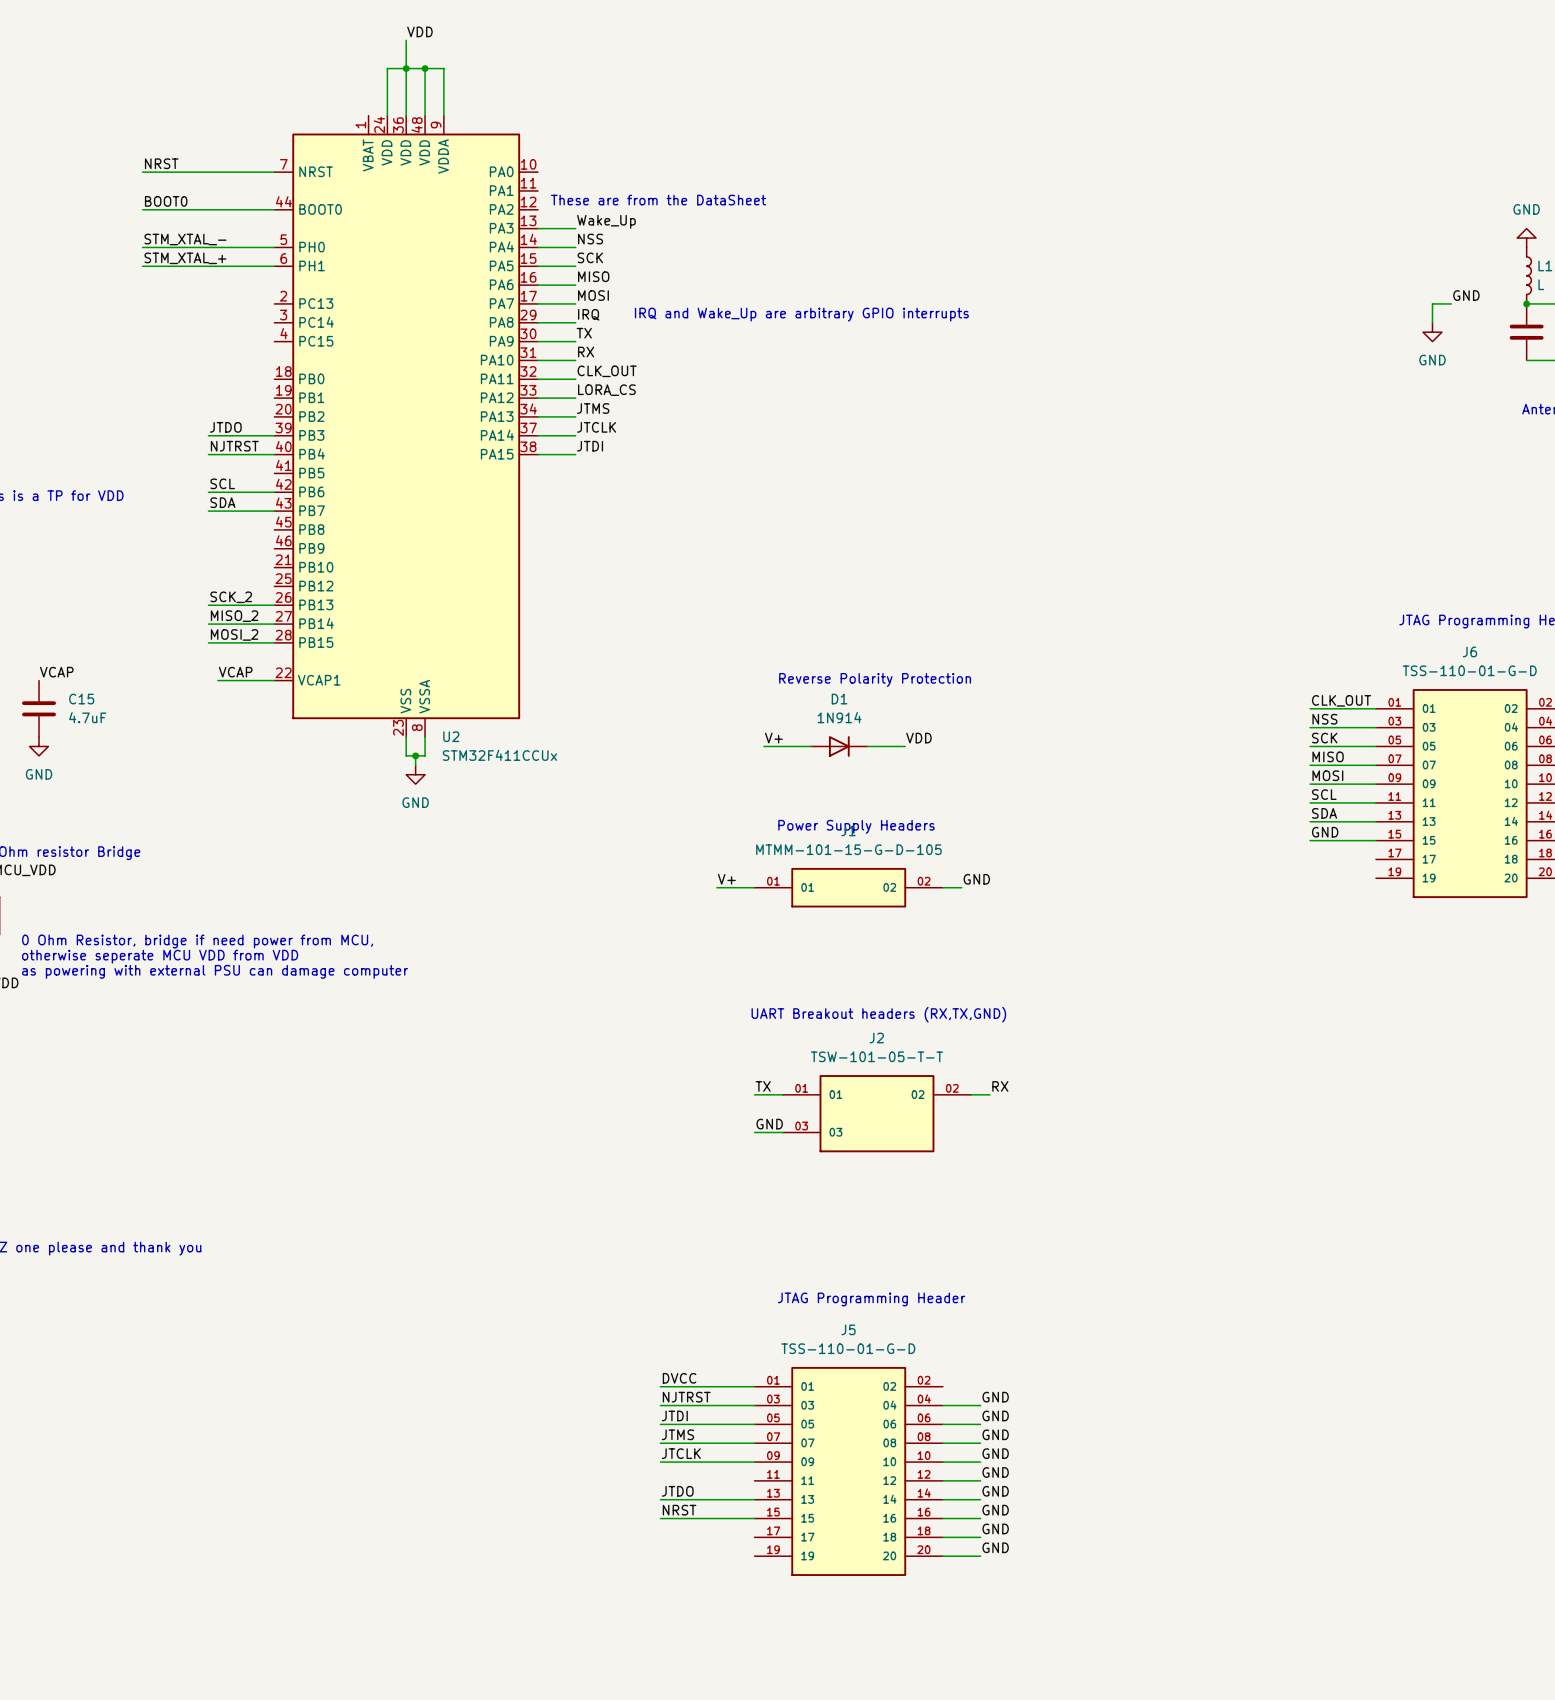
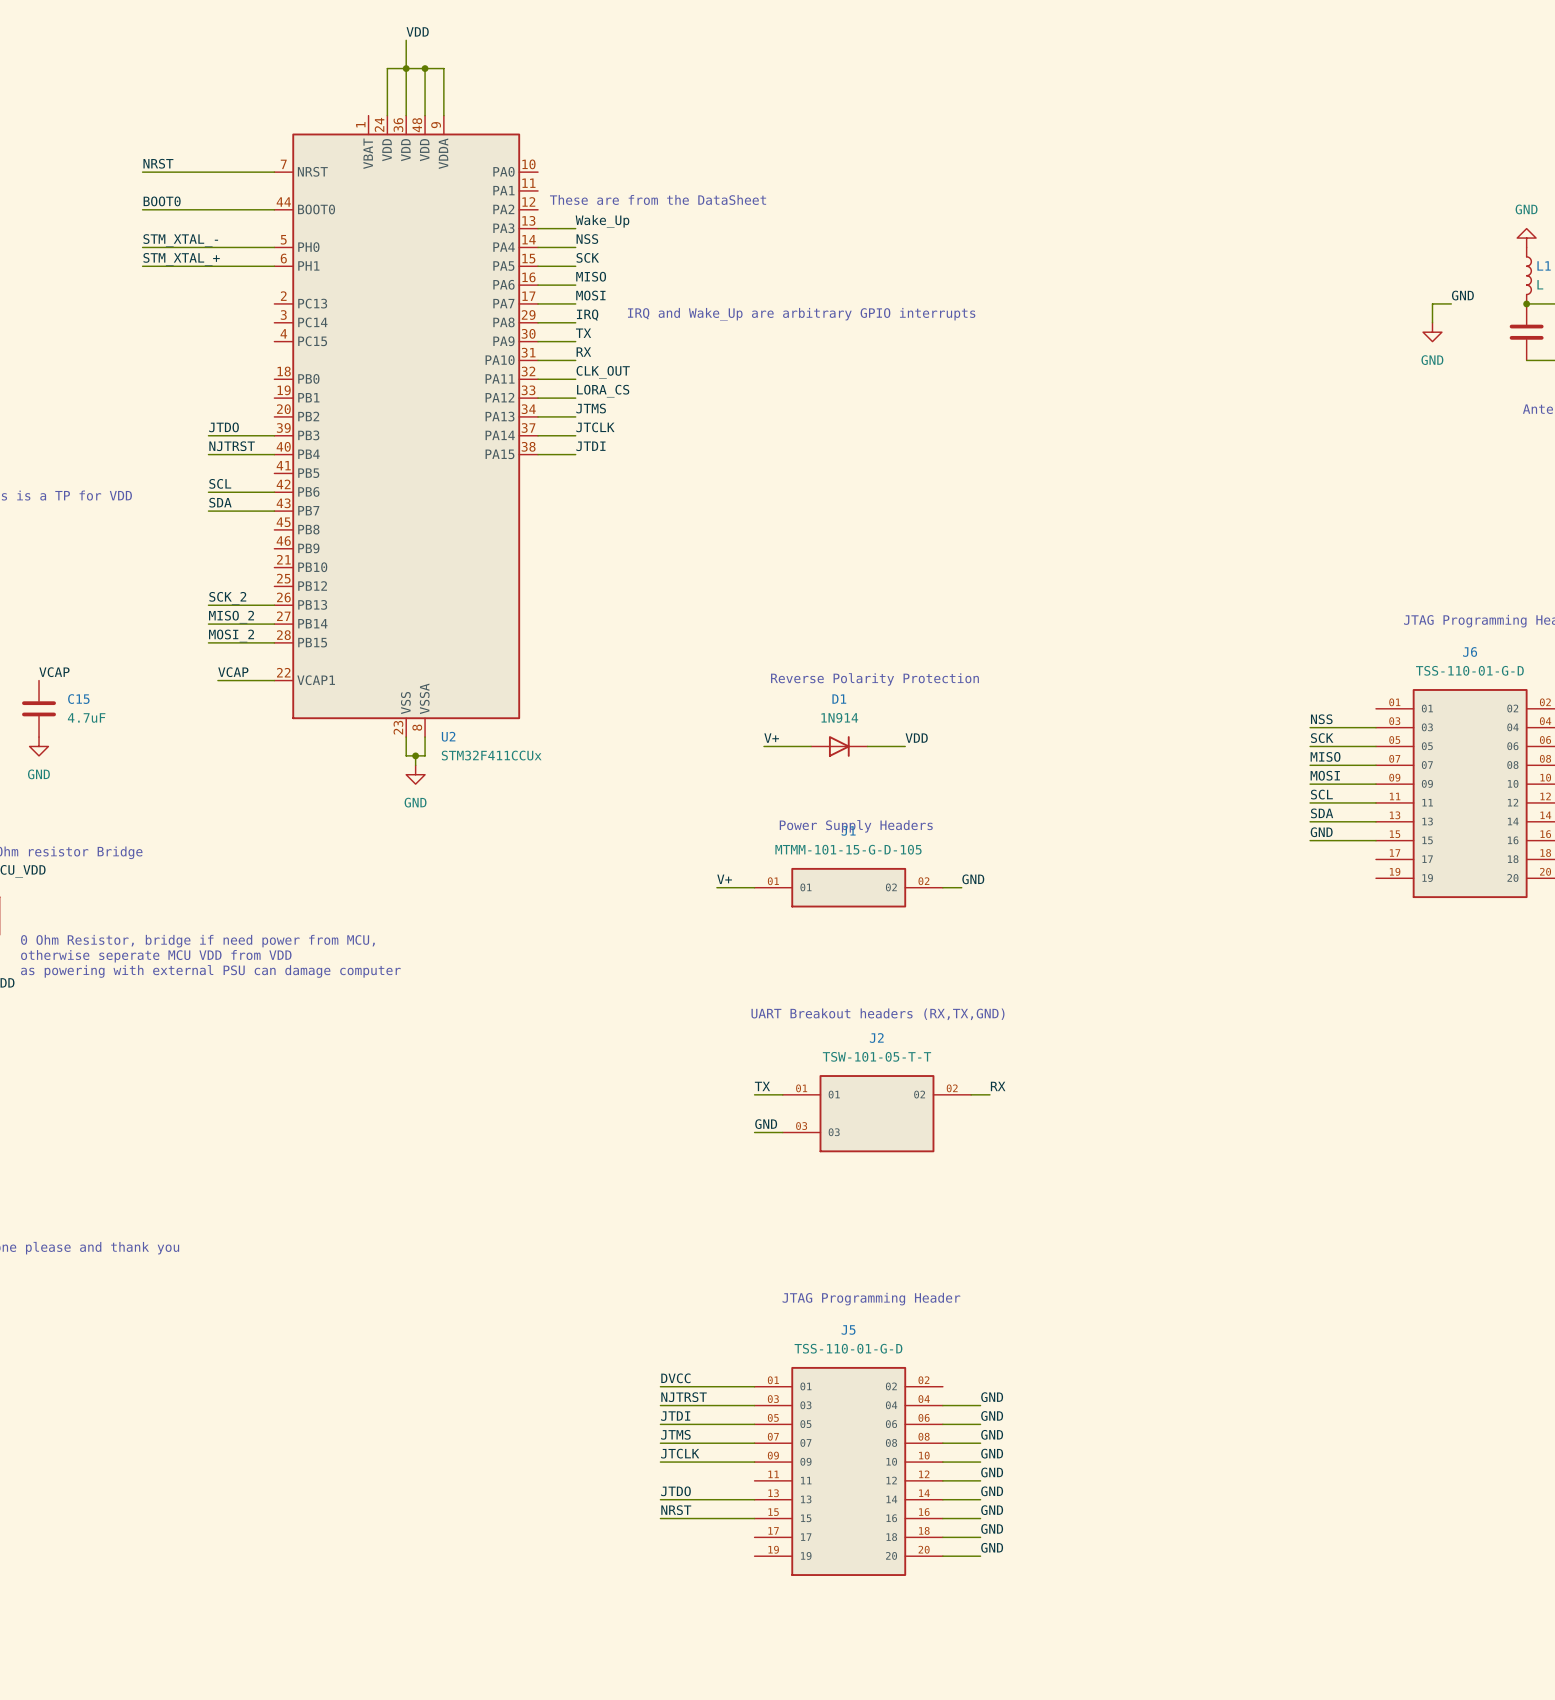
label: CLK_OUT (1341, 700) -> none
wire: (1310, 708) (1375, 708) -> none

